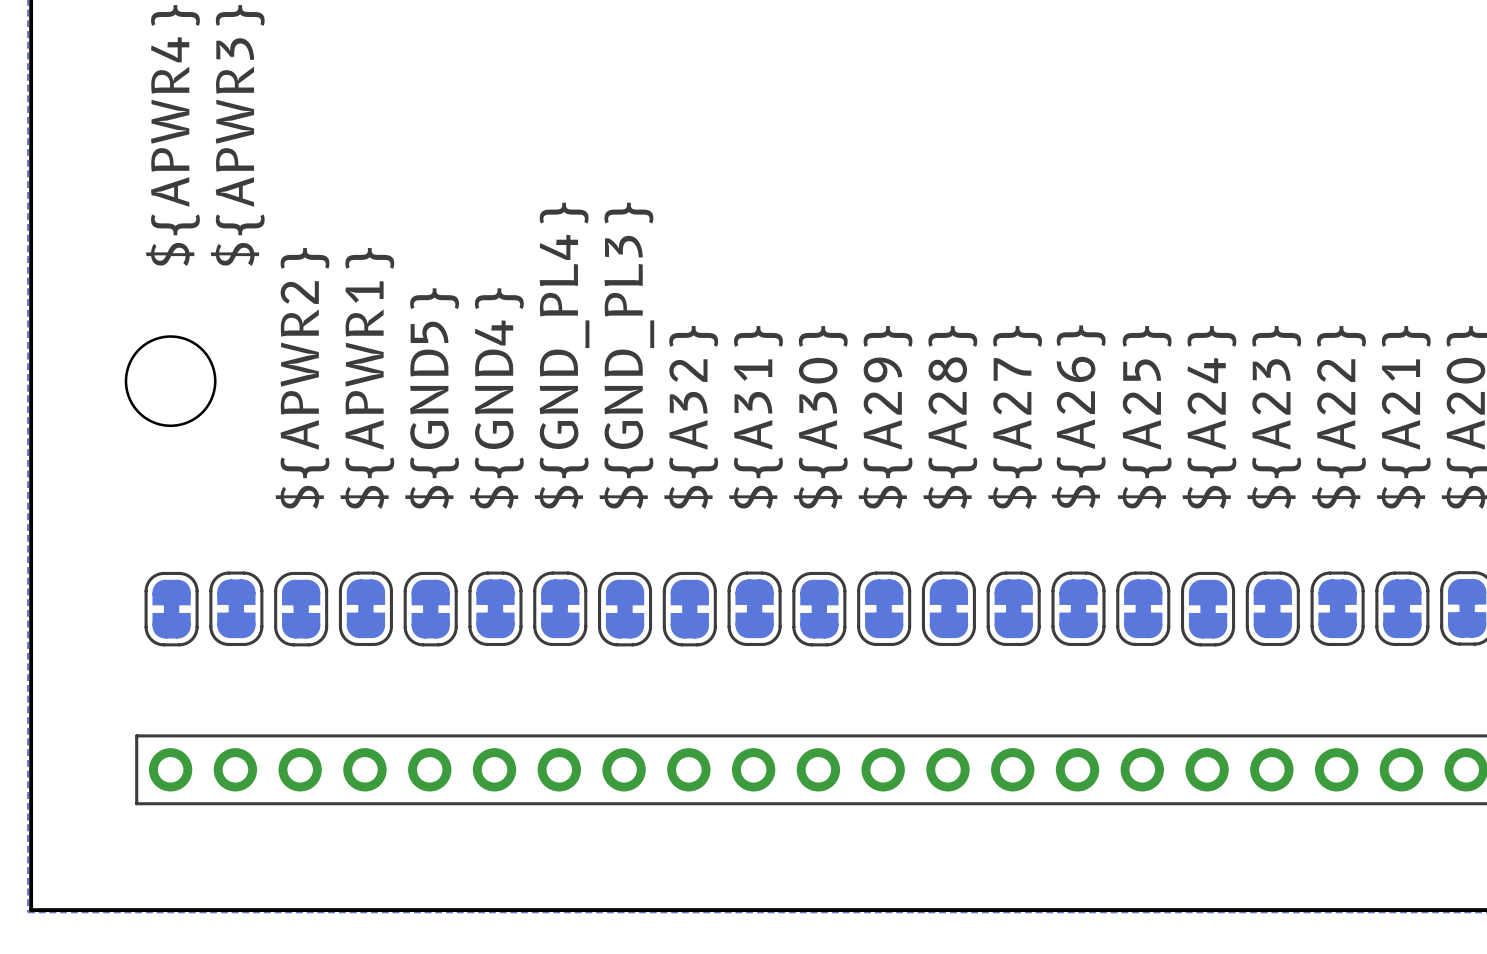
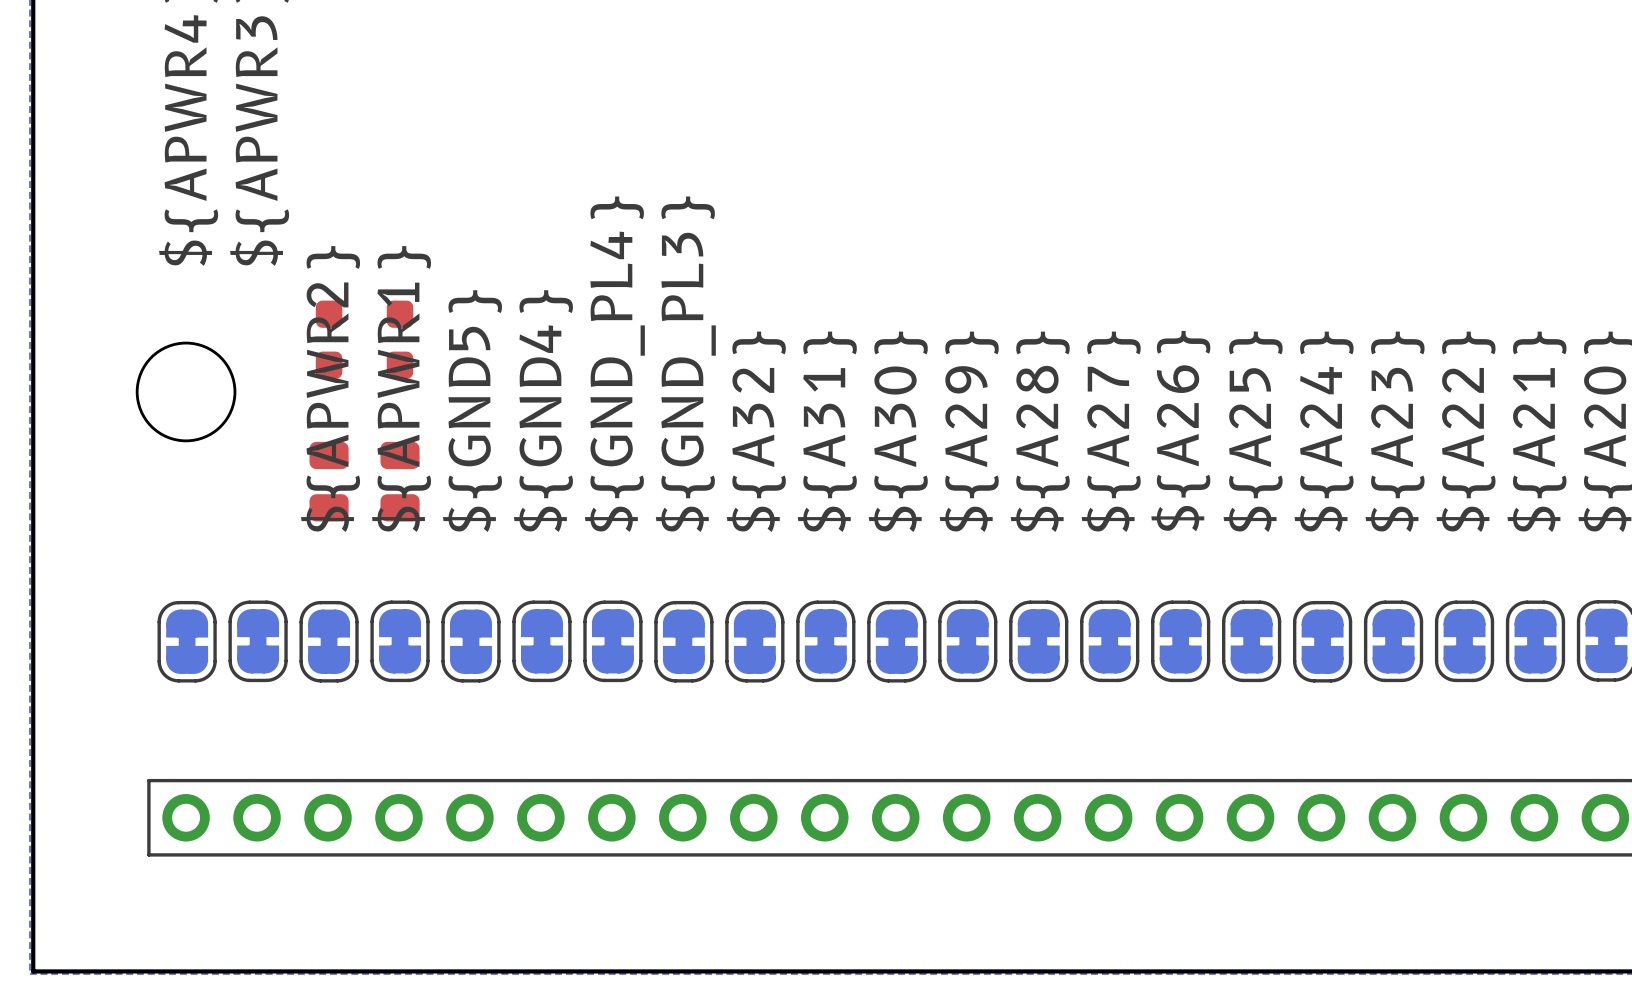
part: none -> (329, 339)
part: none -> (400, 339)
part: none -> (329, 481)
part: none -> (400, 481)

